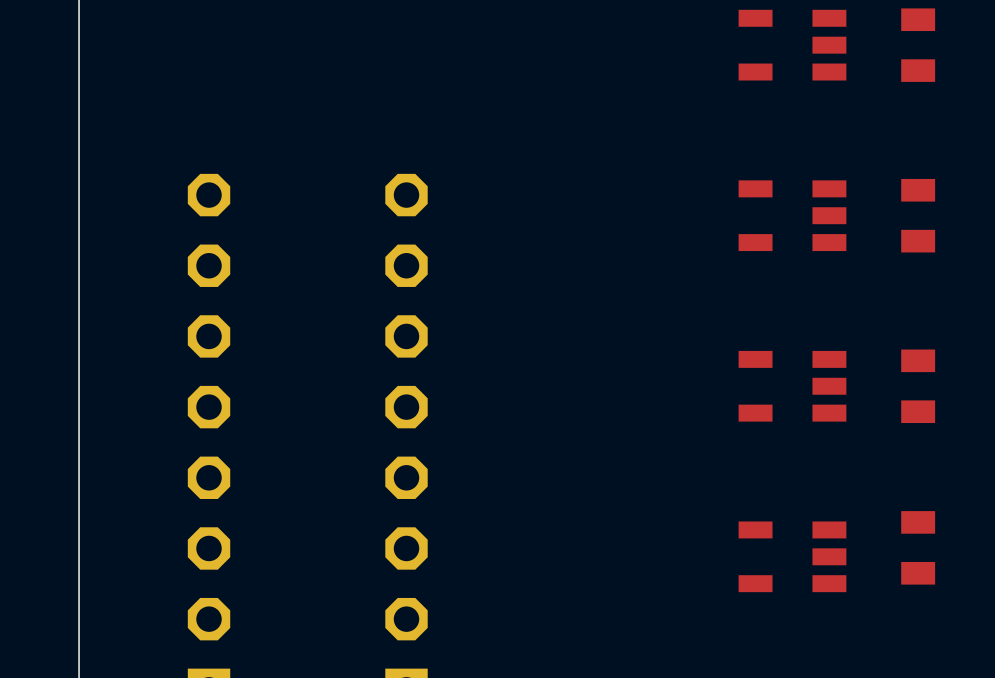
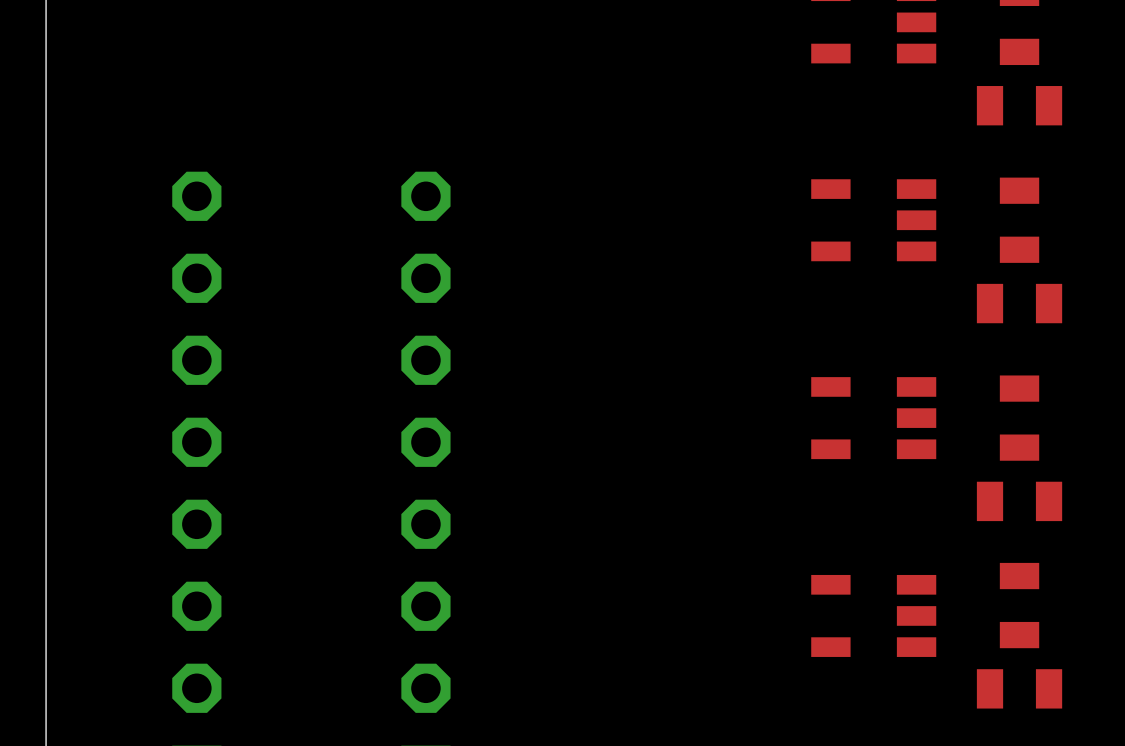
part: none -> (1019, 105)
part: none -> (1019, 303)
part: none -> (1019, 501)
part: none -> (1019, 688)

